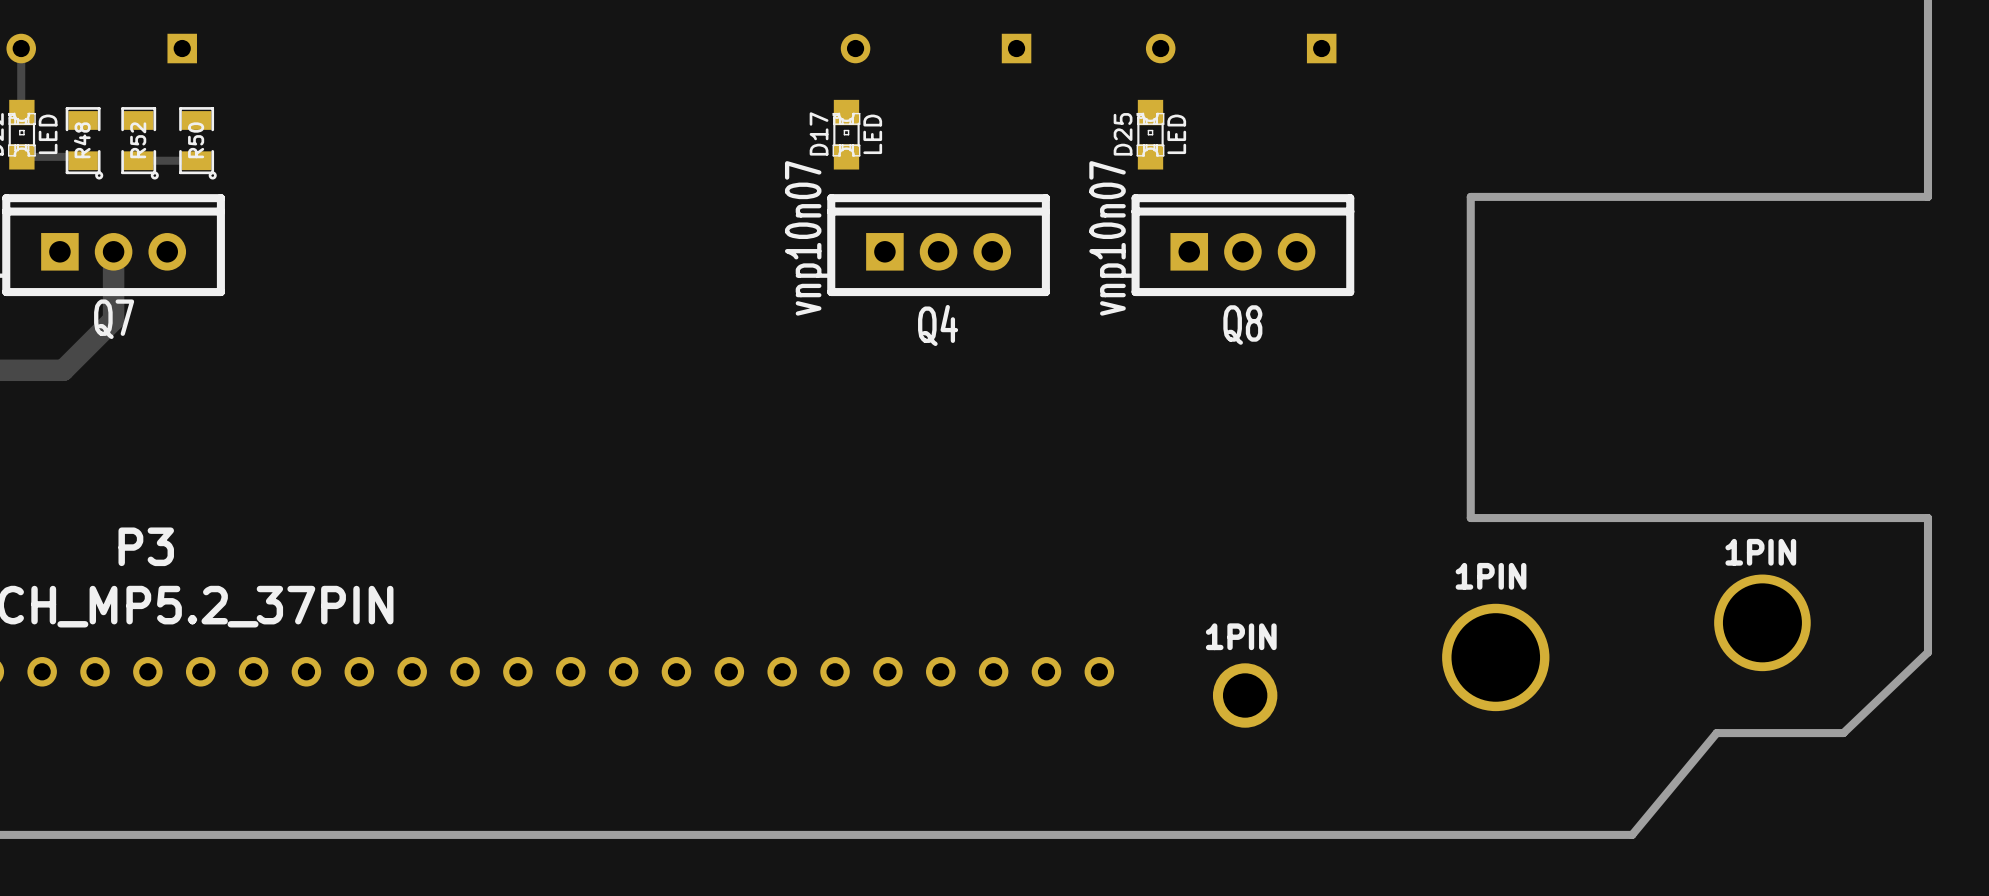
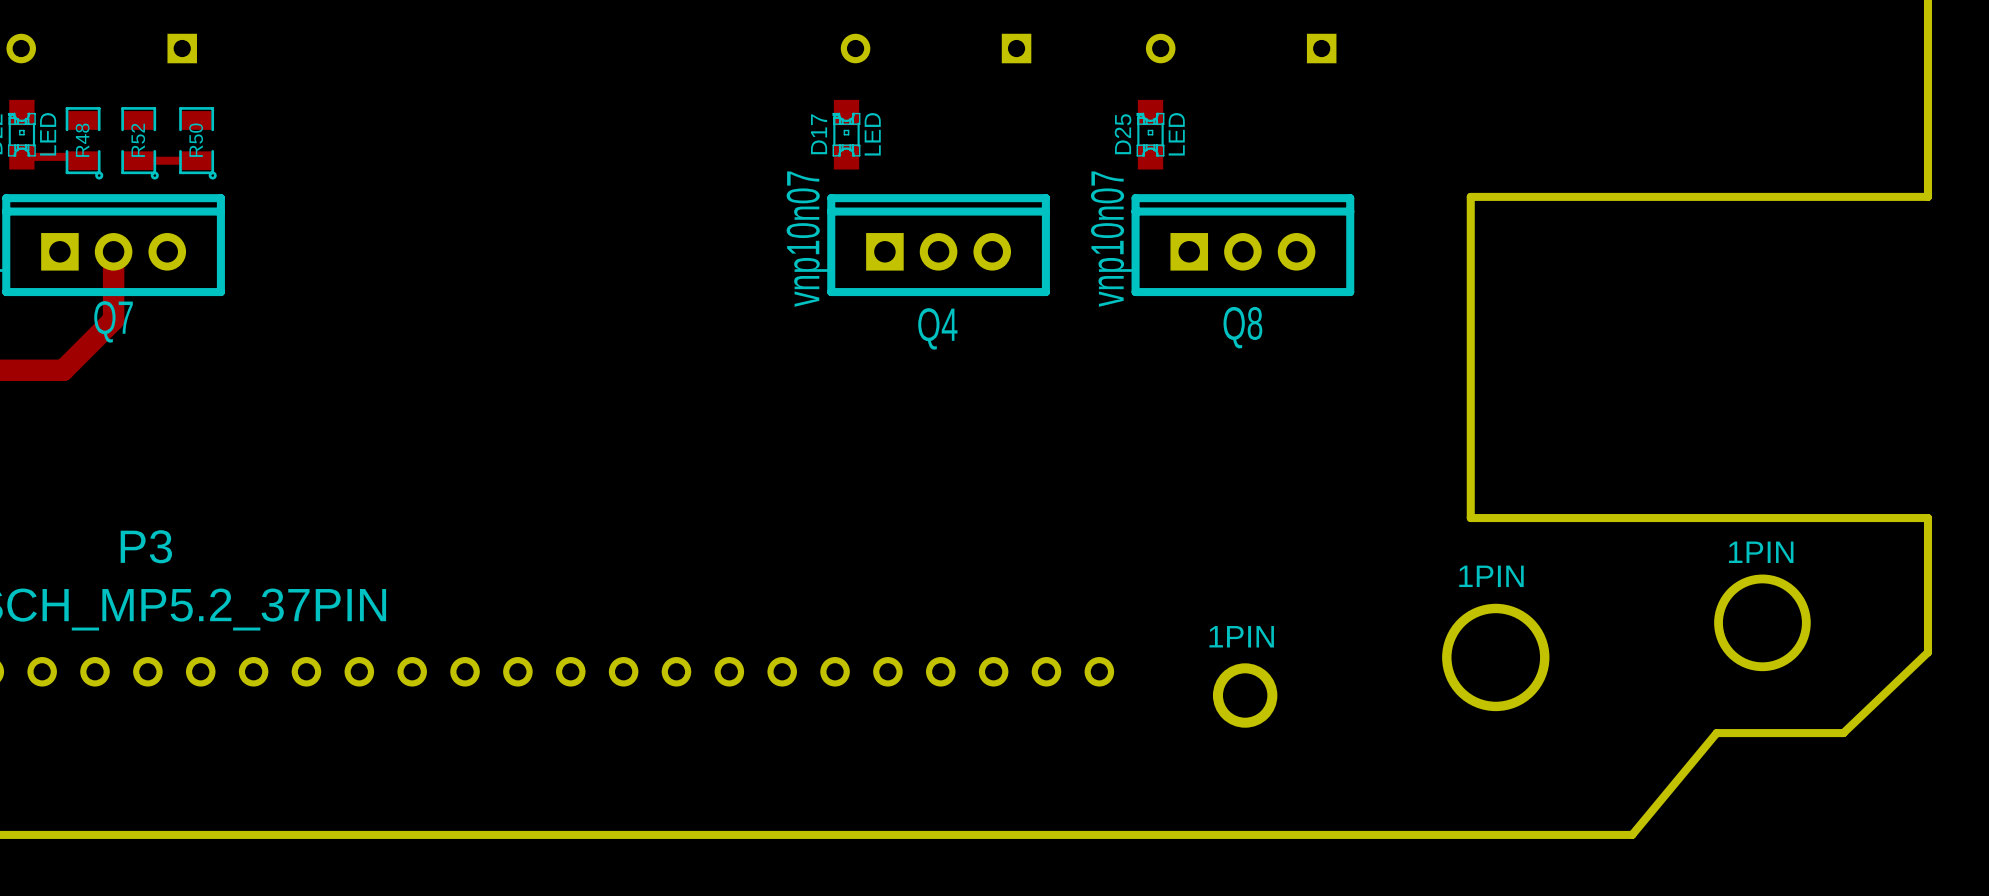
track: (21, 48) (21, 112) -> none

